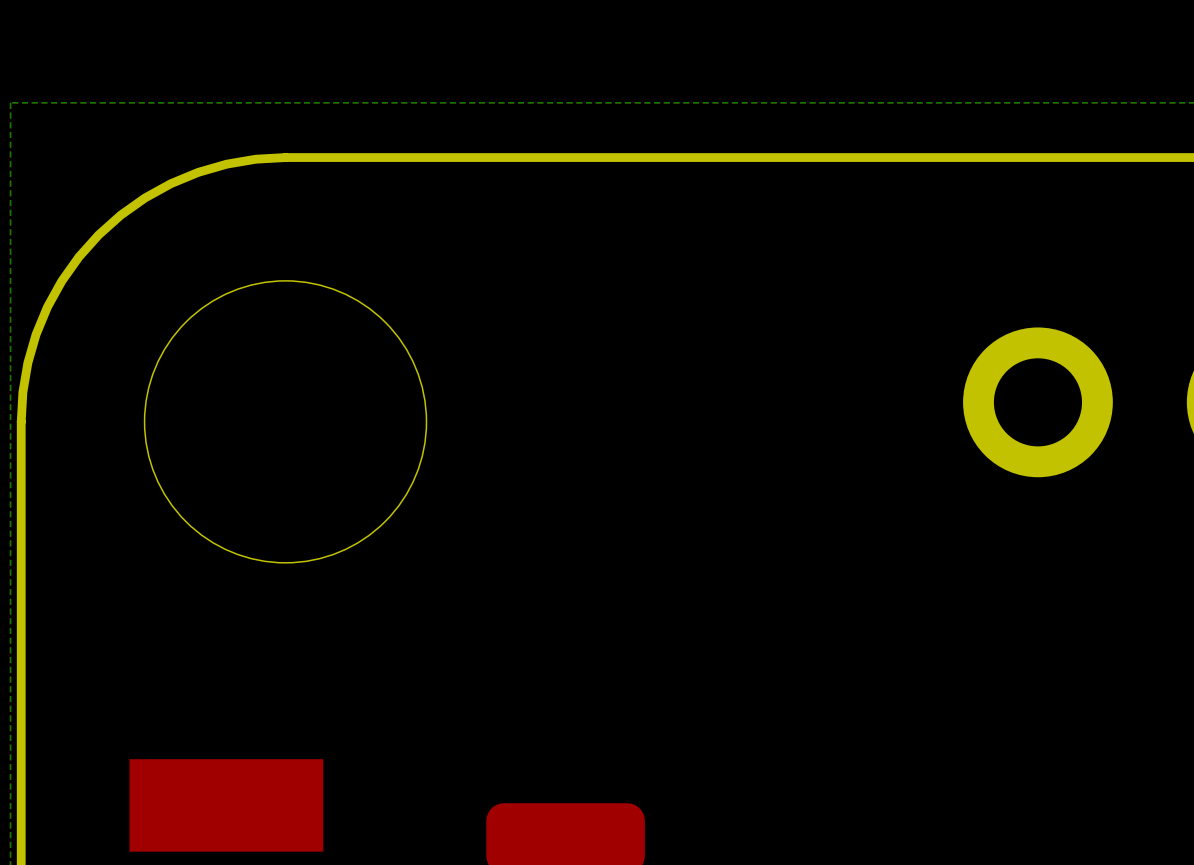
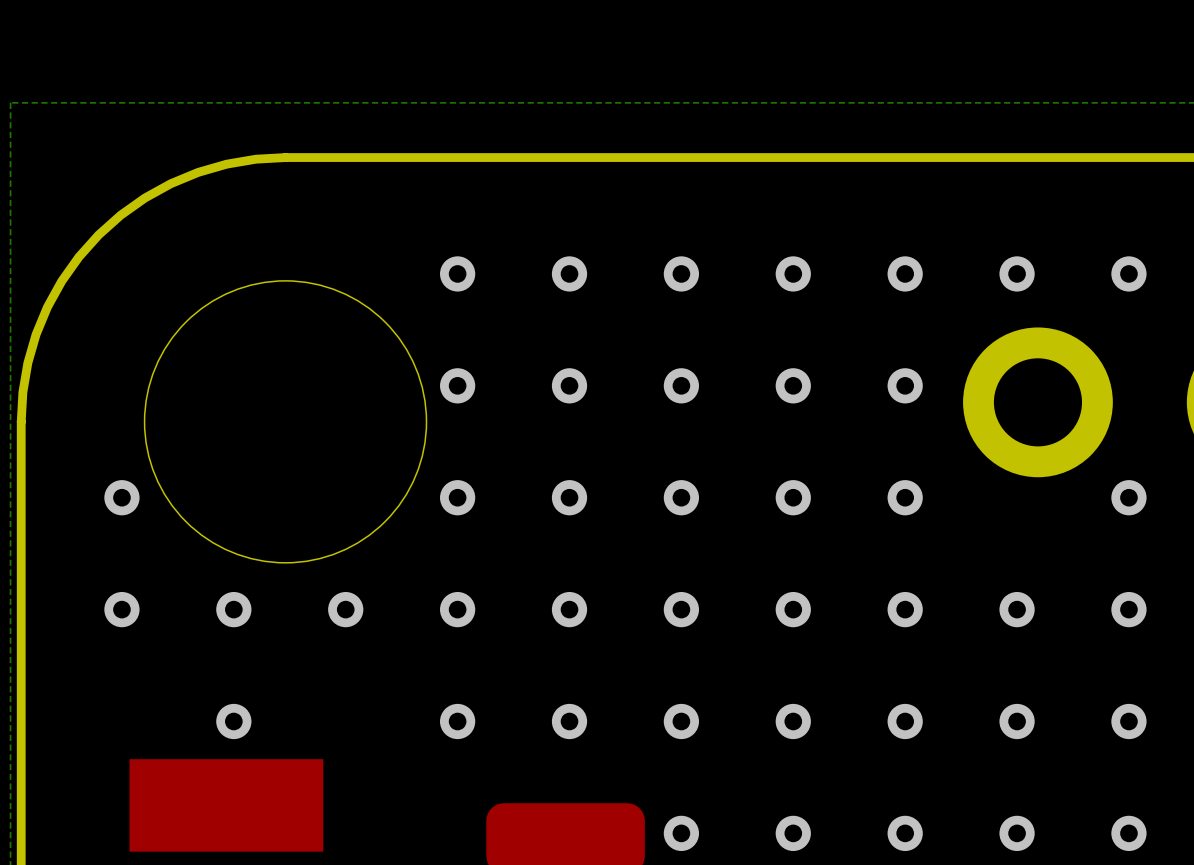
via: none -> (457, 273)
via: none -> (569, 273)
via: none -> (681, 273)
via: none -> (793, 273)
via: none -> (905, 273)
via: none -> (1017, 273)
via: none -> (1128, 273)
via: none -> (457, 385)
via: none -> (569, 385)
via: none -> (681, 385)
via: none -> (793, 385)
via: none -> (905, 385)
via: none -> (121, 497)
via: none -> (457, 497)
via: none -> (569, 497)
via: none -> (681, 497)
via: none -> (793, 497)
via: none -> (905, 497)
via: none -> (1128, 497)
via: none -> (121, 609)
via: none -> (233, 609)
via: none -> (345, 609)
via: none -> (457, 609)
via: none -> (569, 609)
via: none -> (681, 609)
via: none -> (793, 609)
via: none -> (905, 609)
via: none -> (1017, 609)
via: none -> (1128, 609)
via: none -> (233, 721)
via: none -> (457, 721)
via: none -> (569, 721)
via: none -> (681, 721)
via: none -> (793, 721)
via: none -> (905, 721)
via: none -> (1017, 721)
via: none -> (1128, 721)
via: none -> (681, 833)
via: none -> (793, 833)
via: none -> (905, 833)
via: none -> (1017, 833)
via: none -> (1128, 833)

